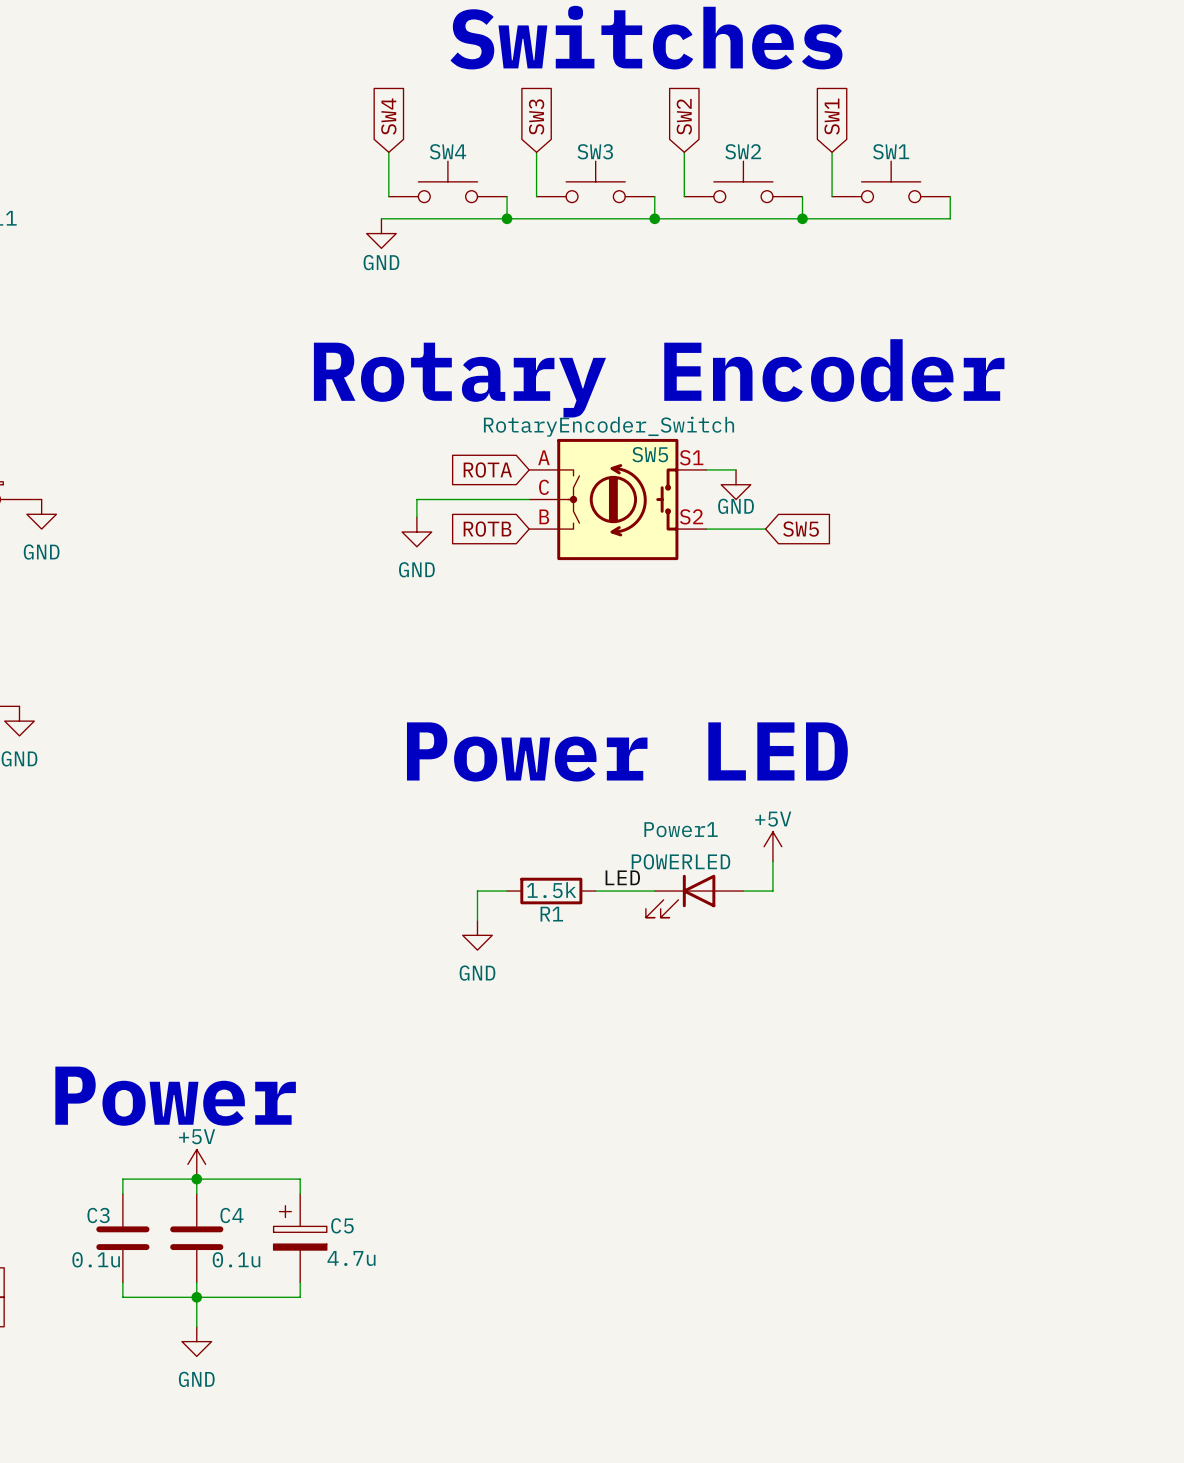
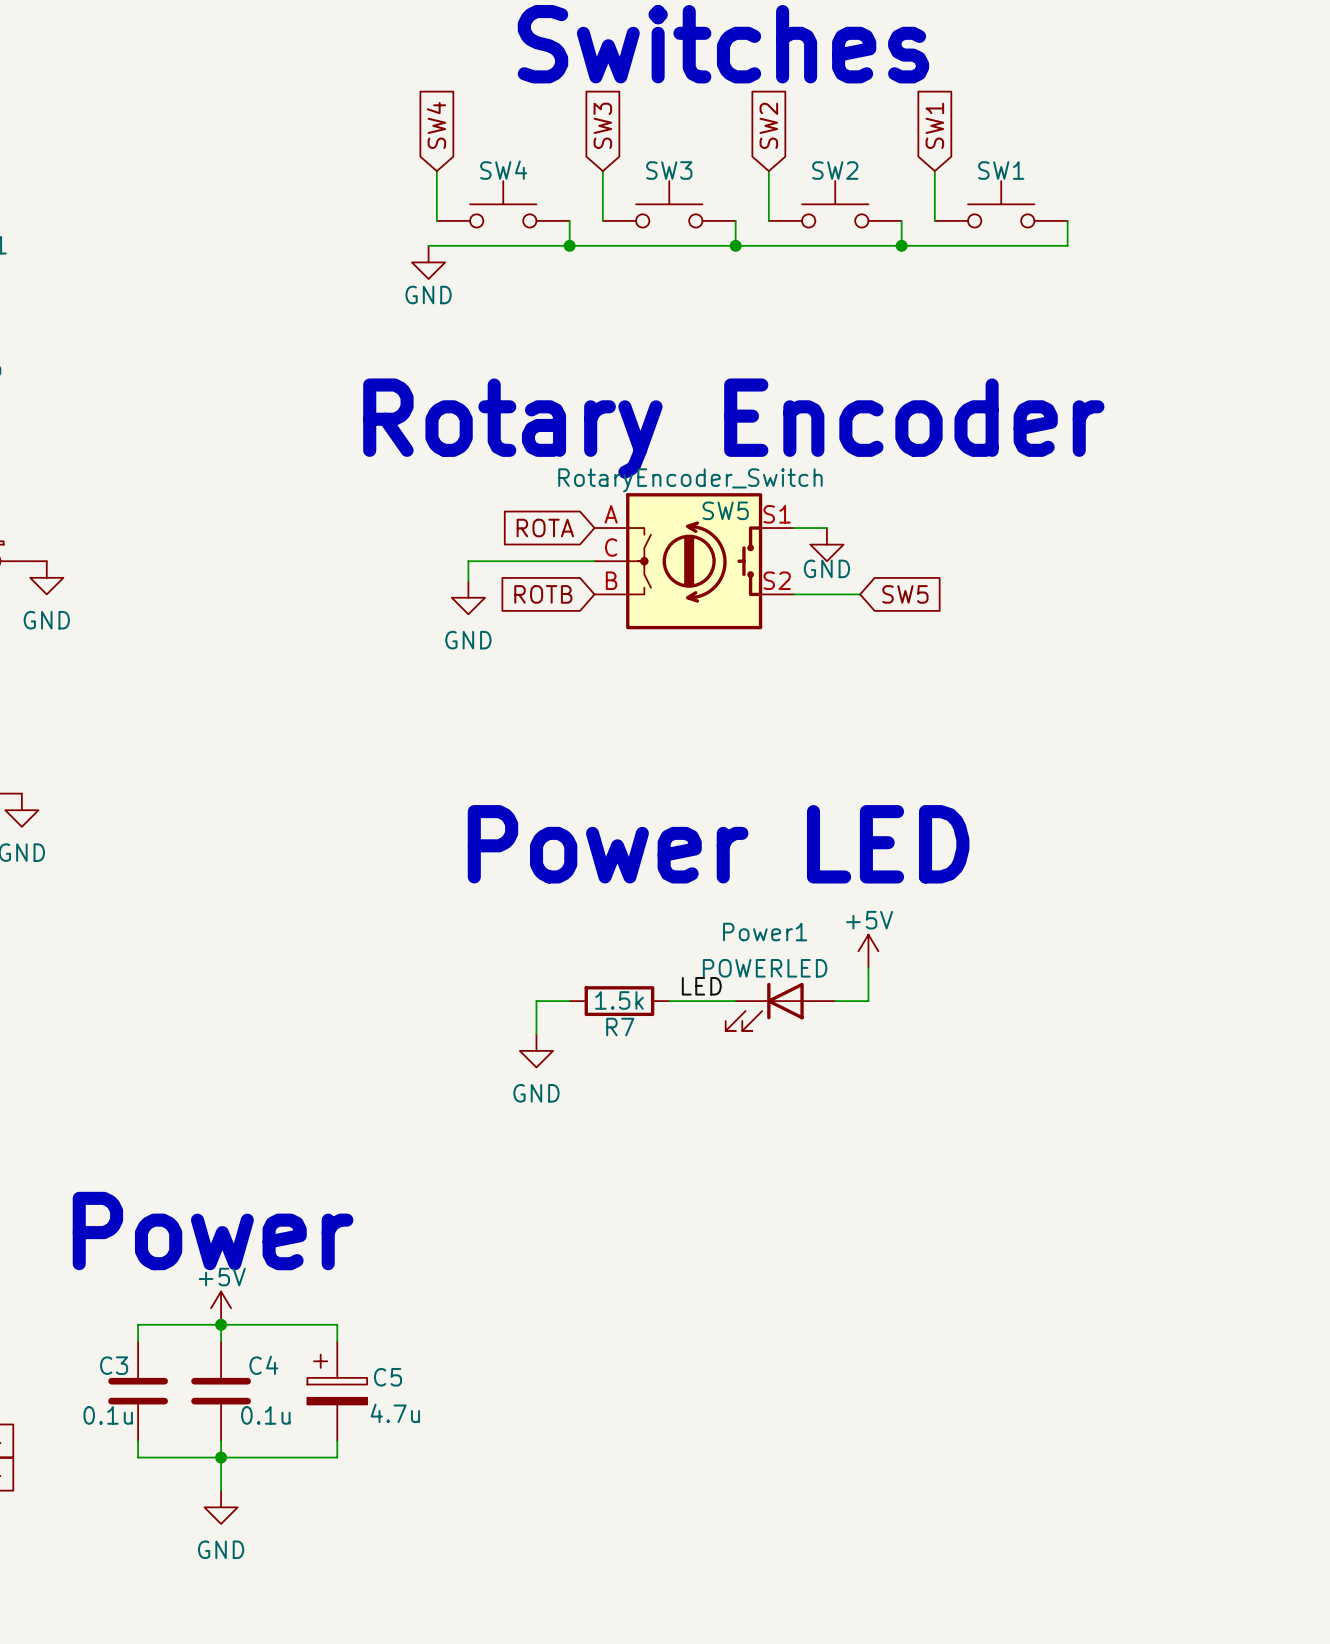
R1 name: R1 (551, 914) -> R7 (620, 1027)

